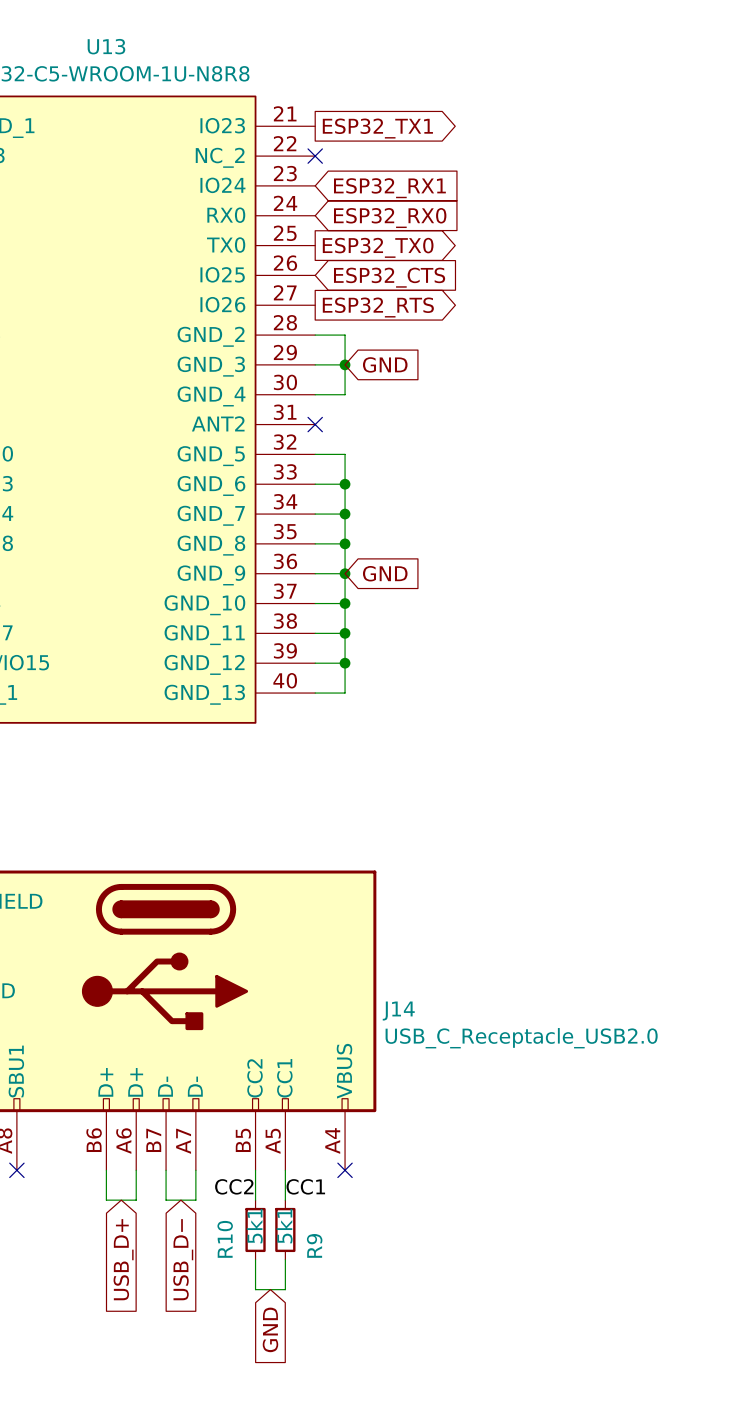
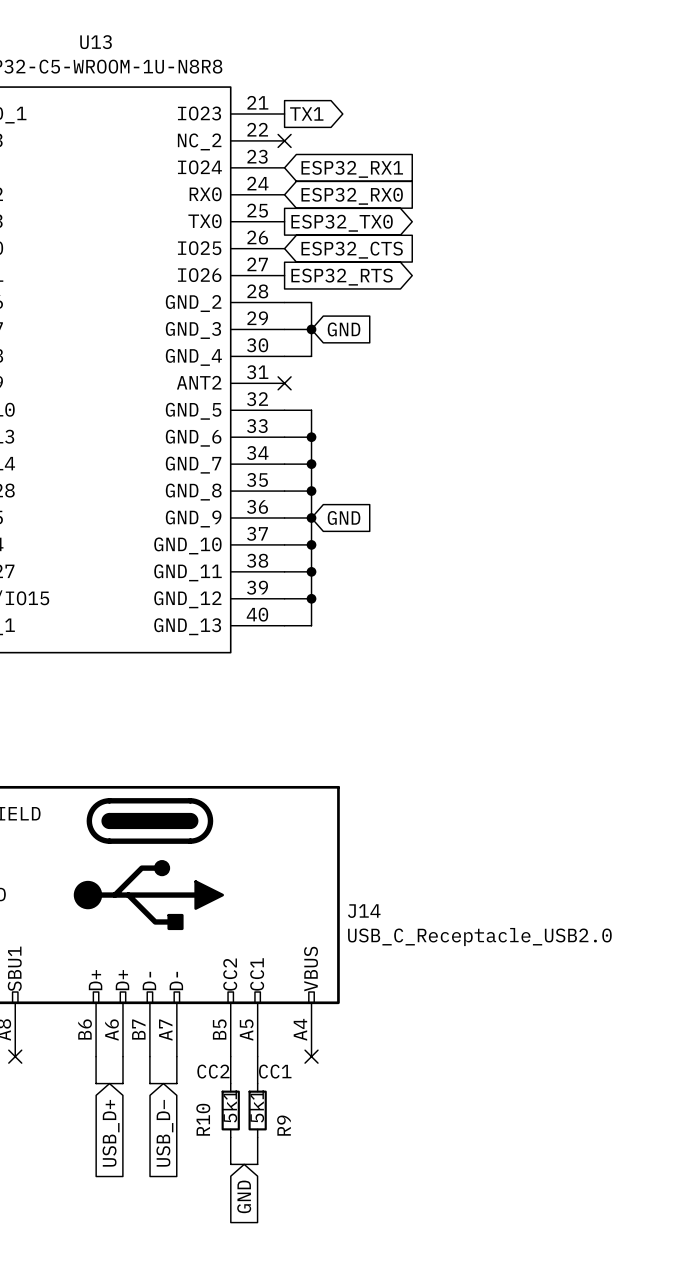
global label: ESP32_TX1 (377, 128) -> TX1 (306, 113)

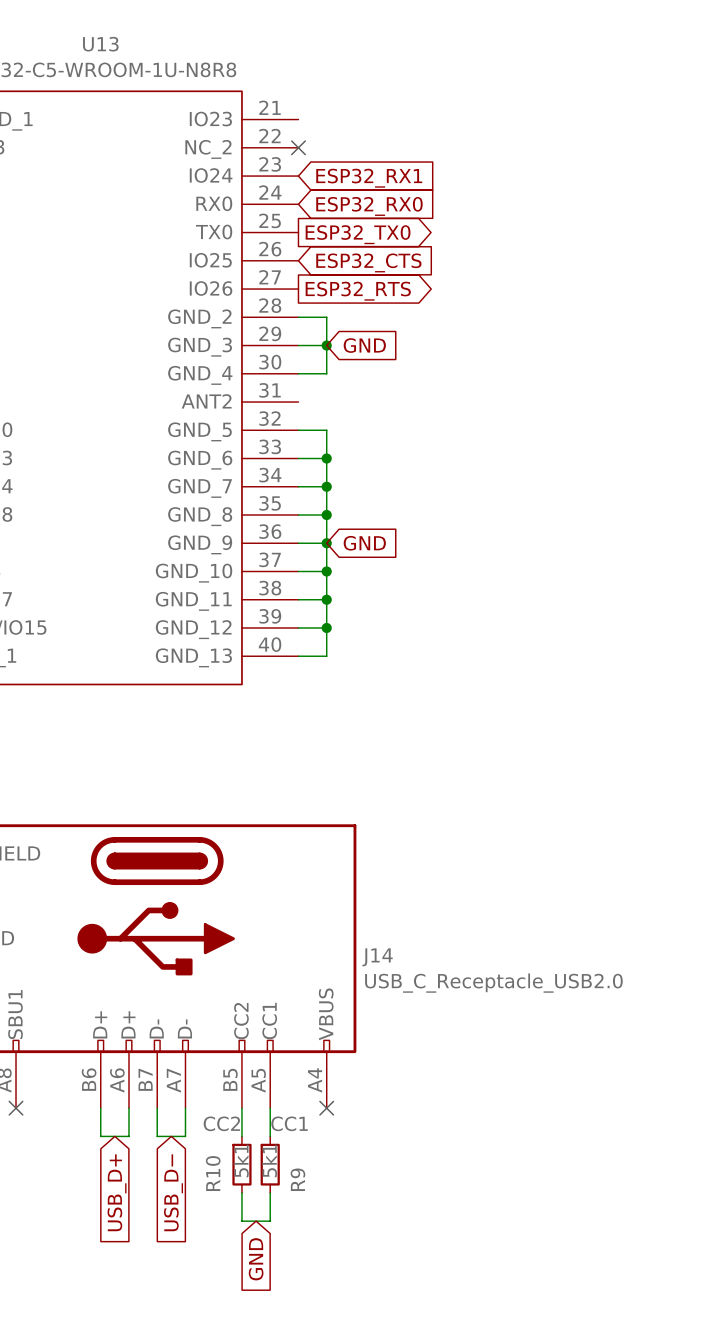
global label: TX1 (306, 113) -> none
no-connect mark: (284, 383) -> none

